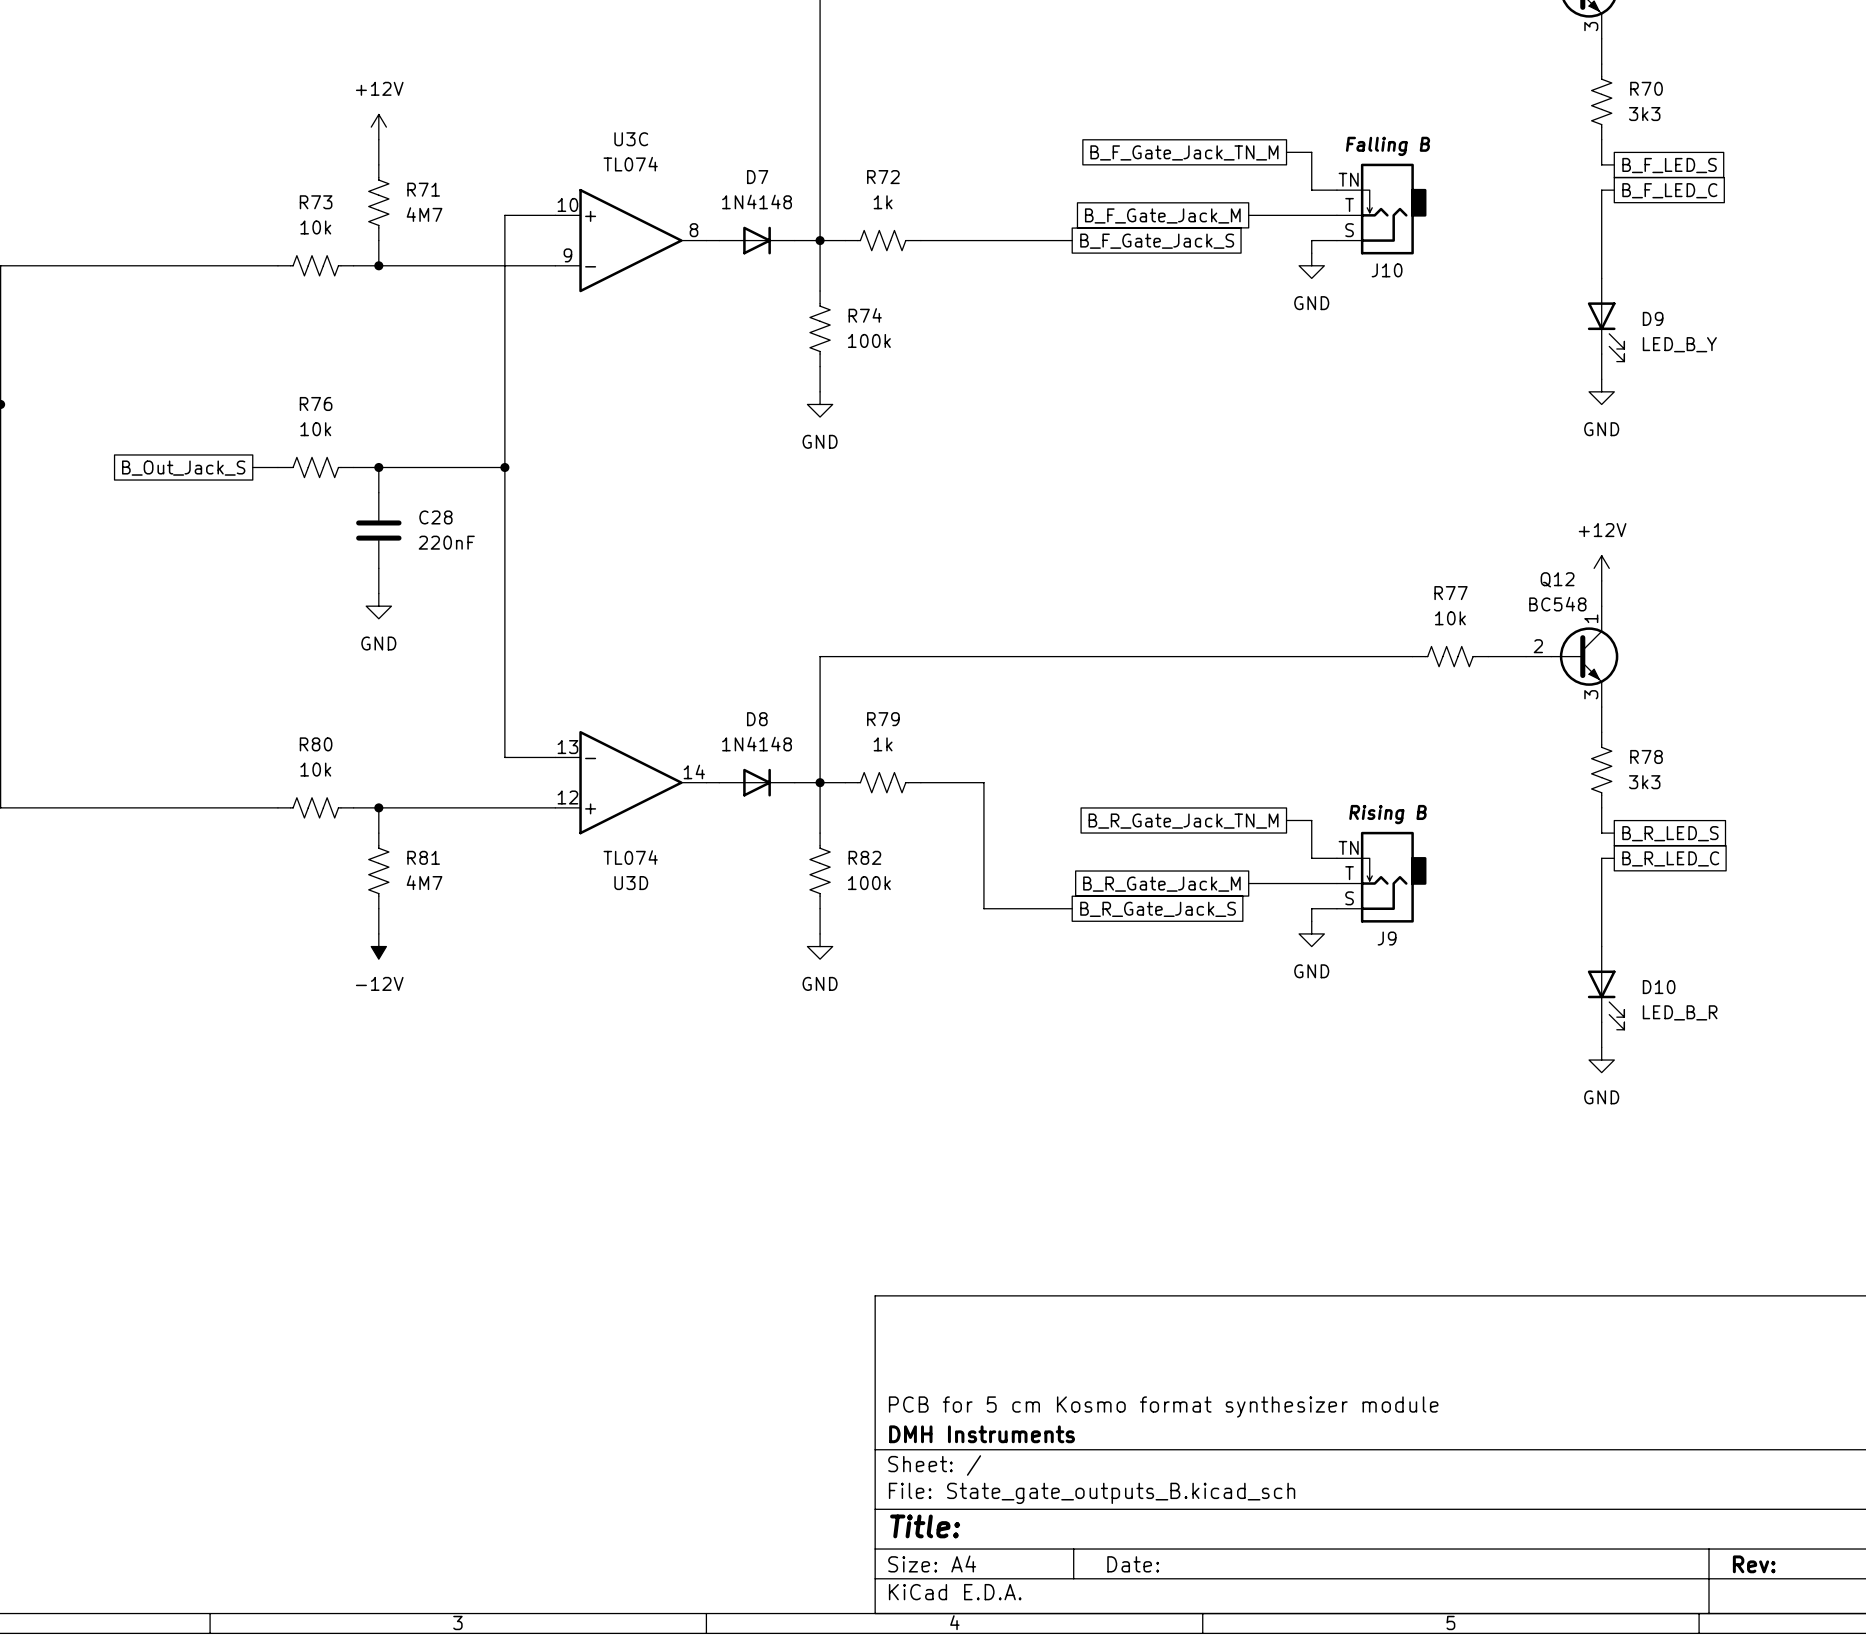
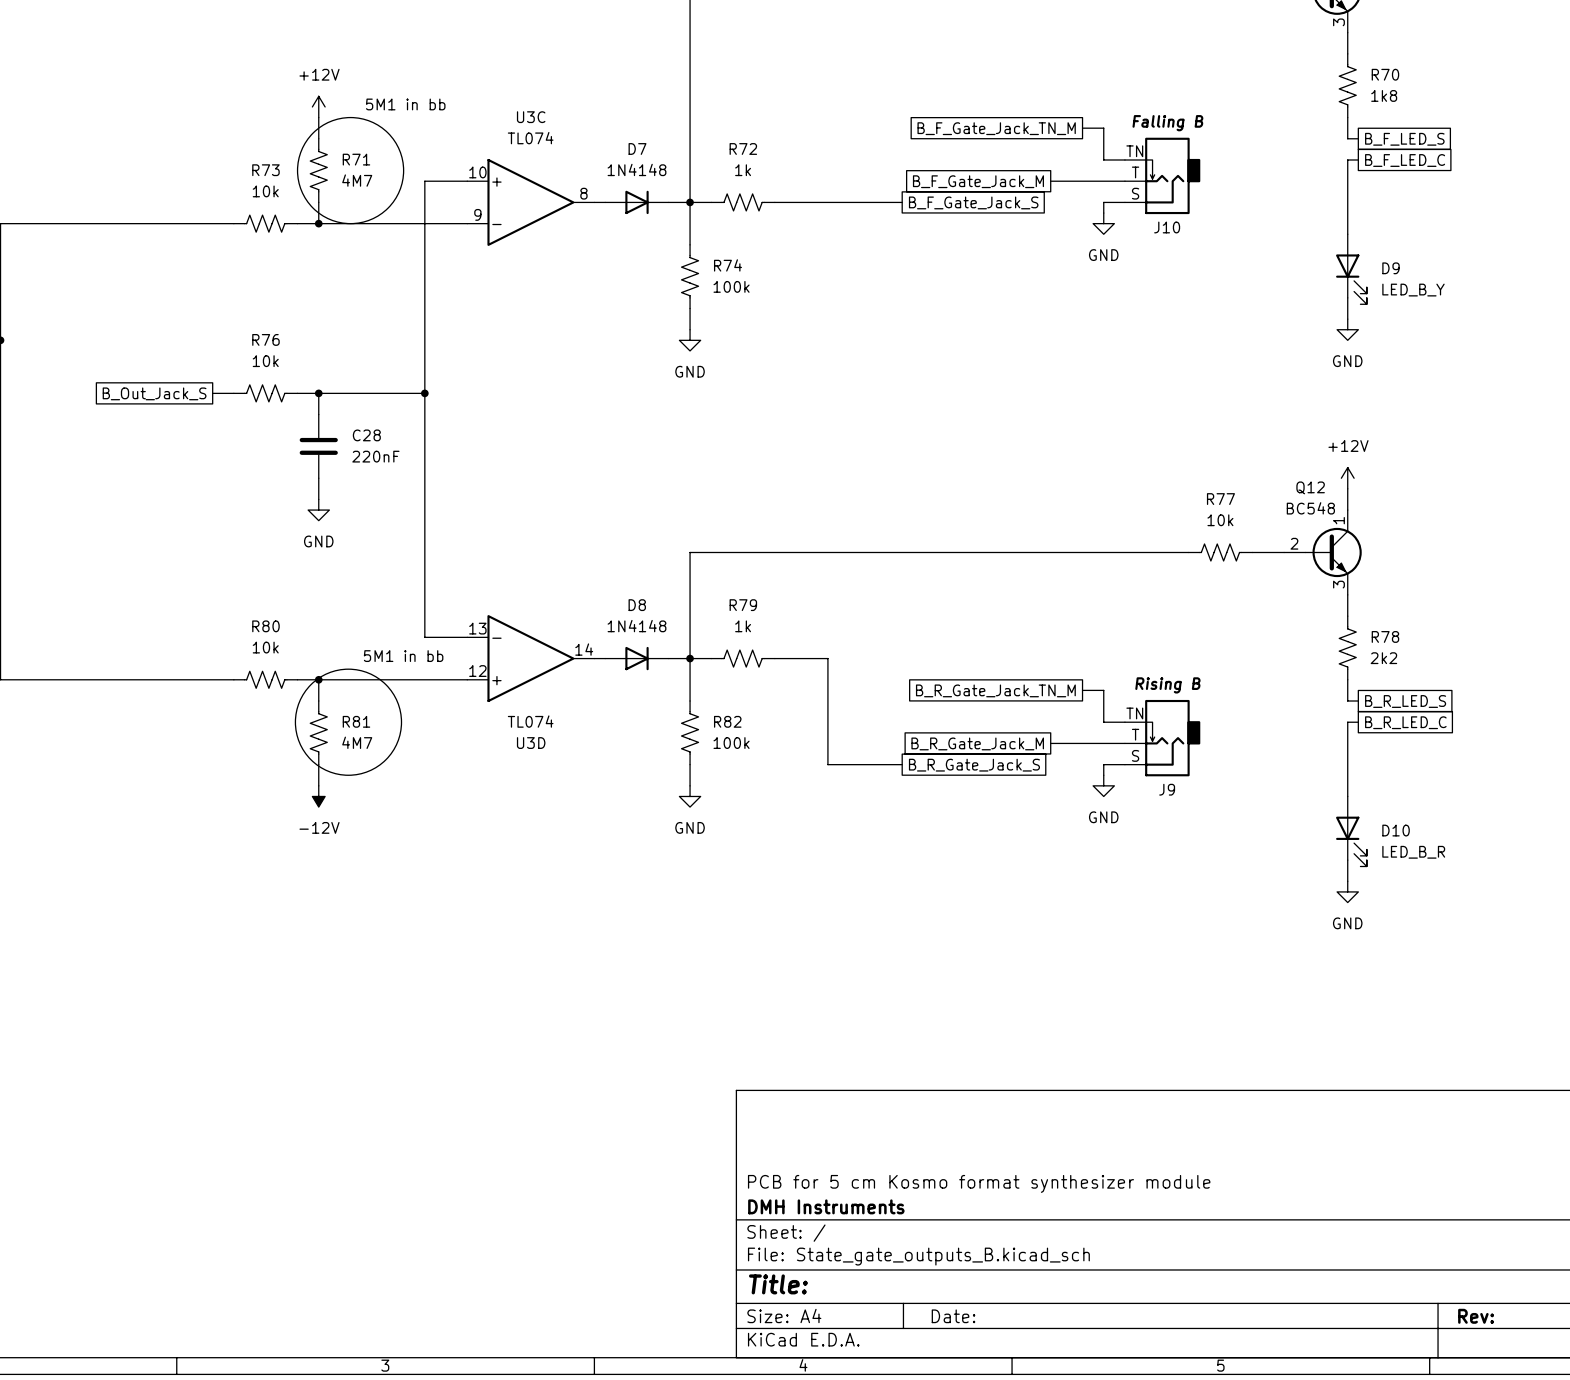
R70 value: 3k3 (1644, 114) -> 1k8 (1384, 95)
text: none -> 5M1 in bb (405, 104)
drawing: none -> [297, 117, 404, 224]
text: none -> 5M1 in bb (403, 656)
R78 value: 3k3 (1644, 782) -> 2k2 (1383, 658)
drawing: none -> [295, 669, 402, 776]

